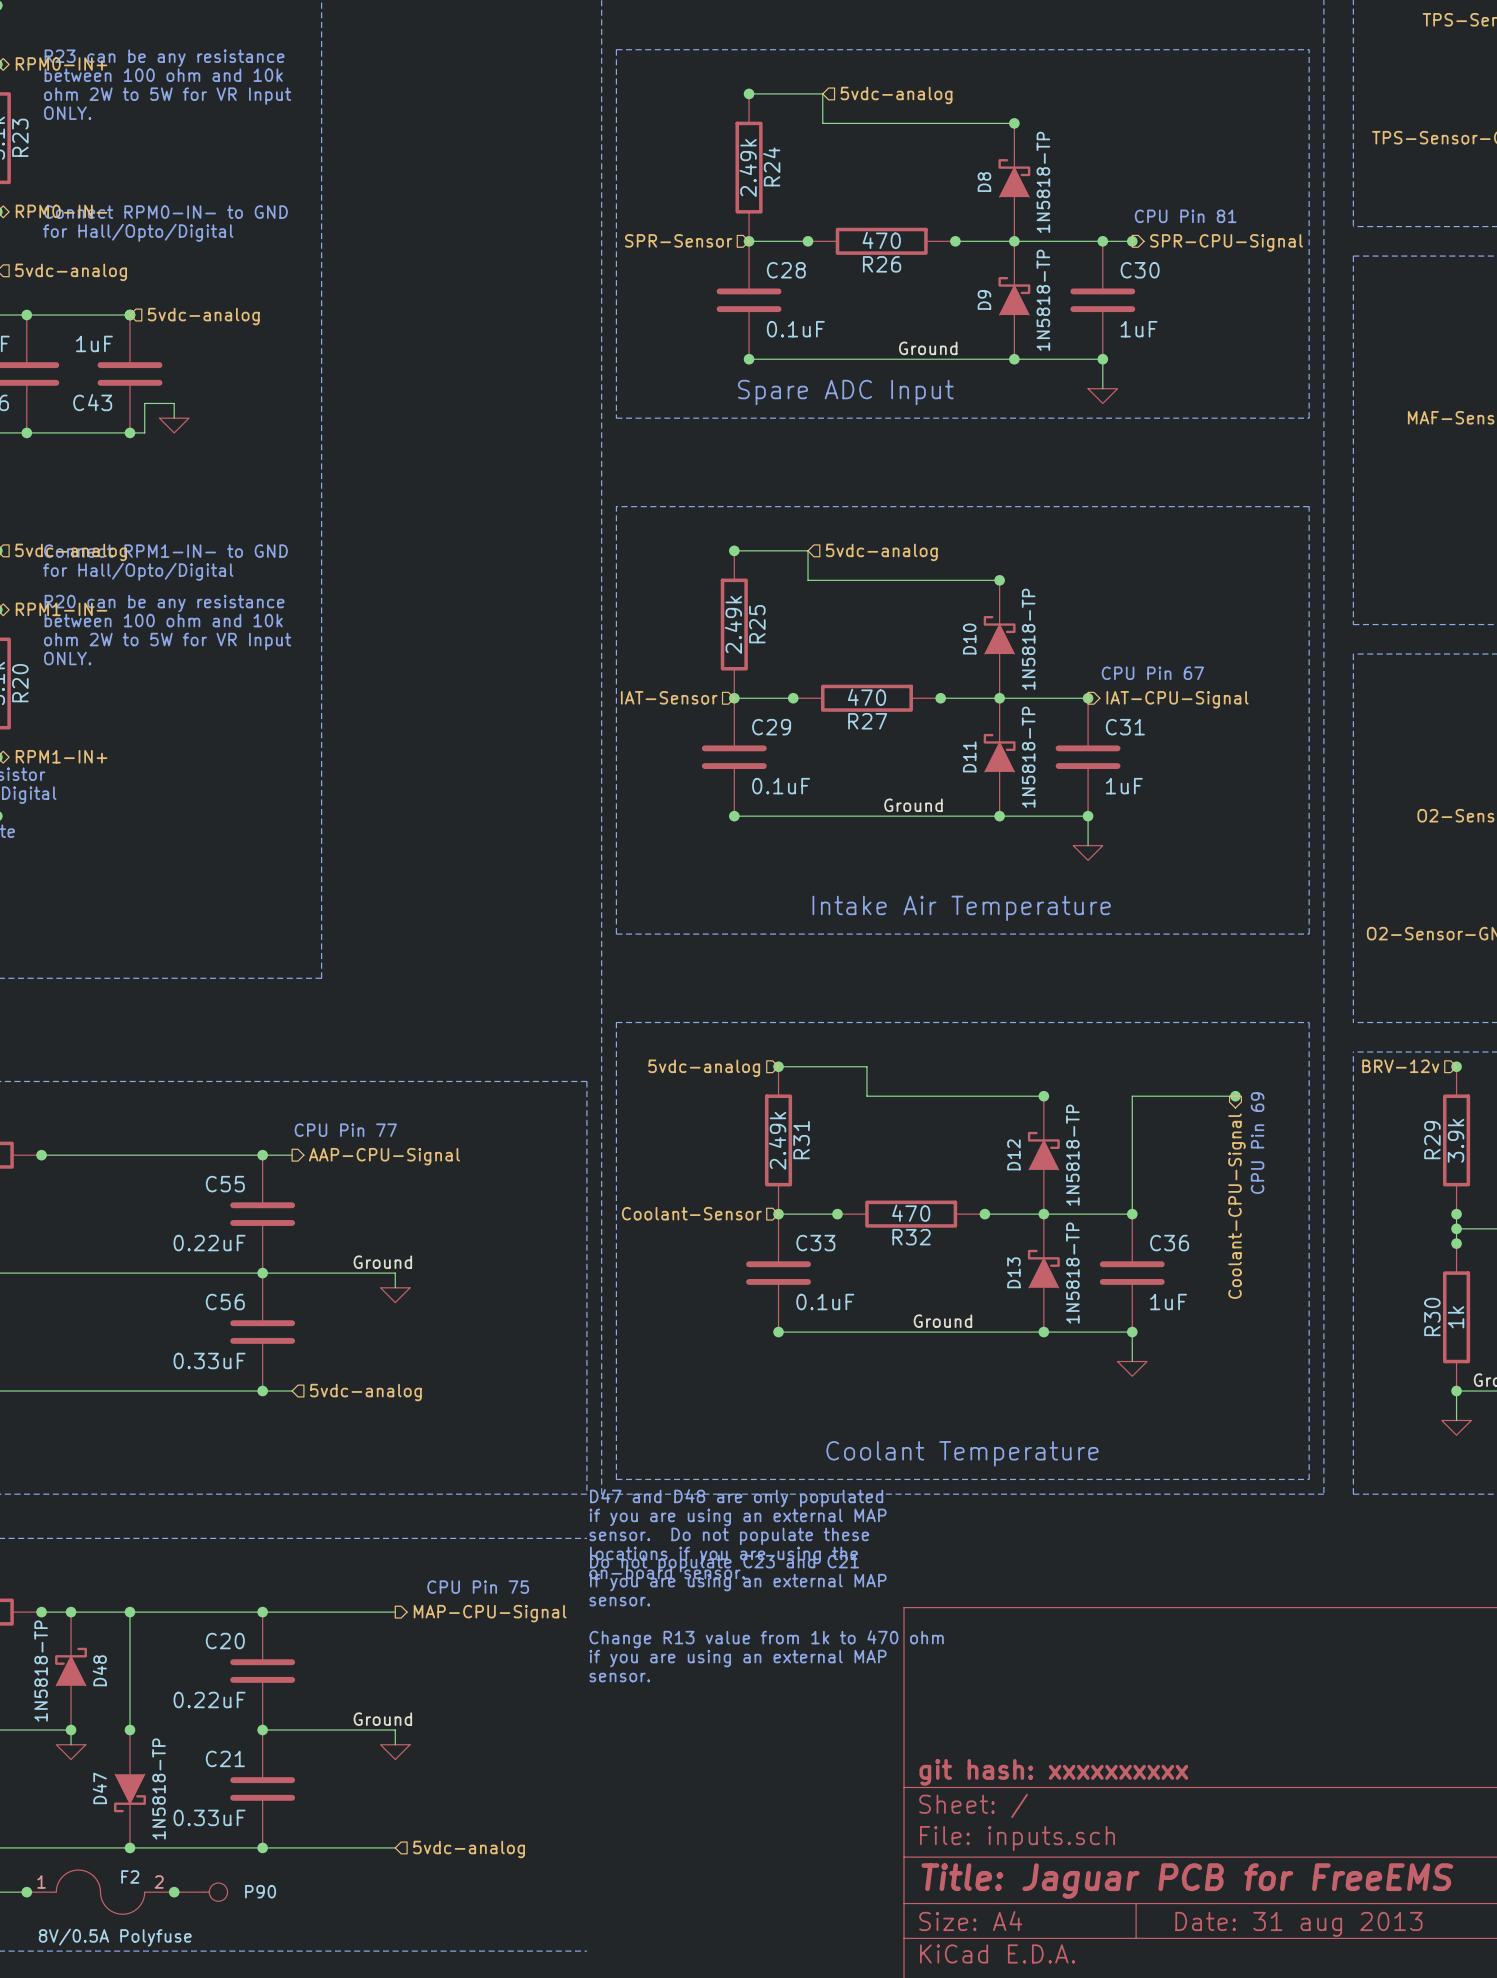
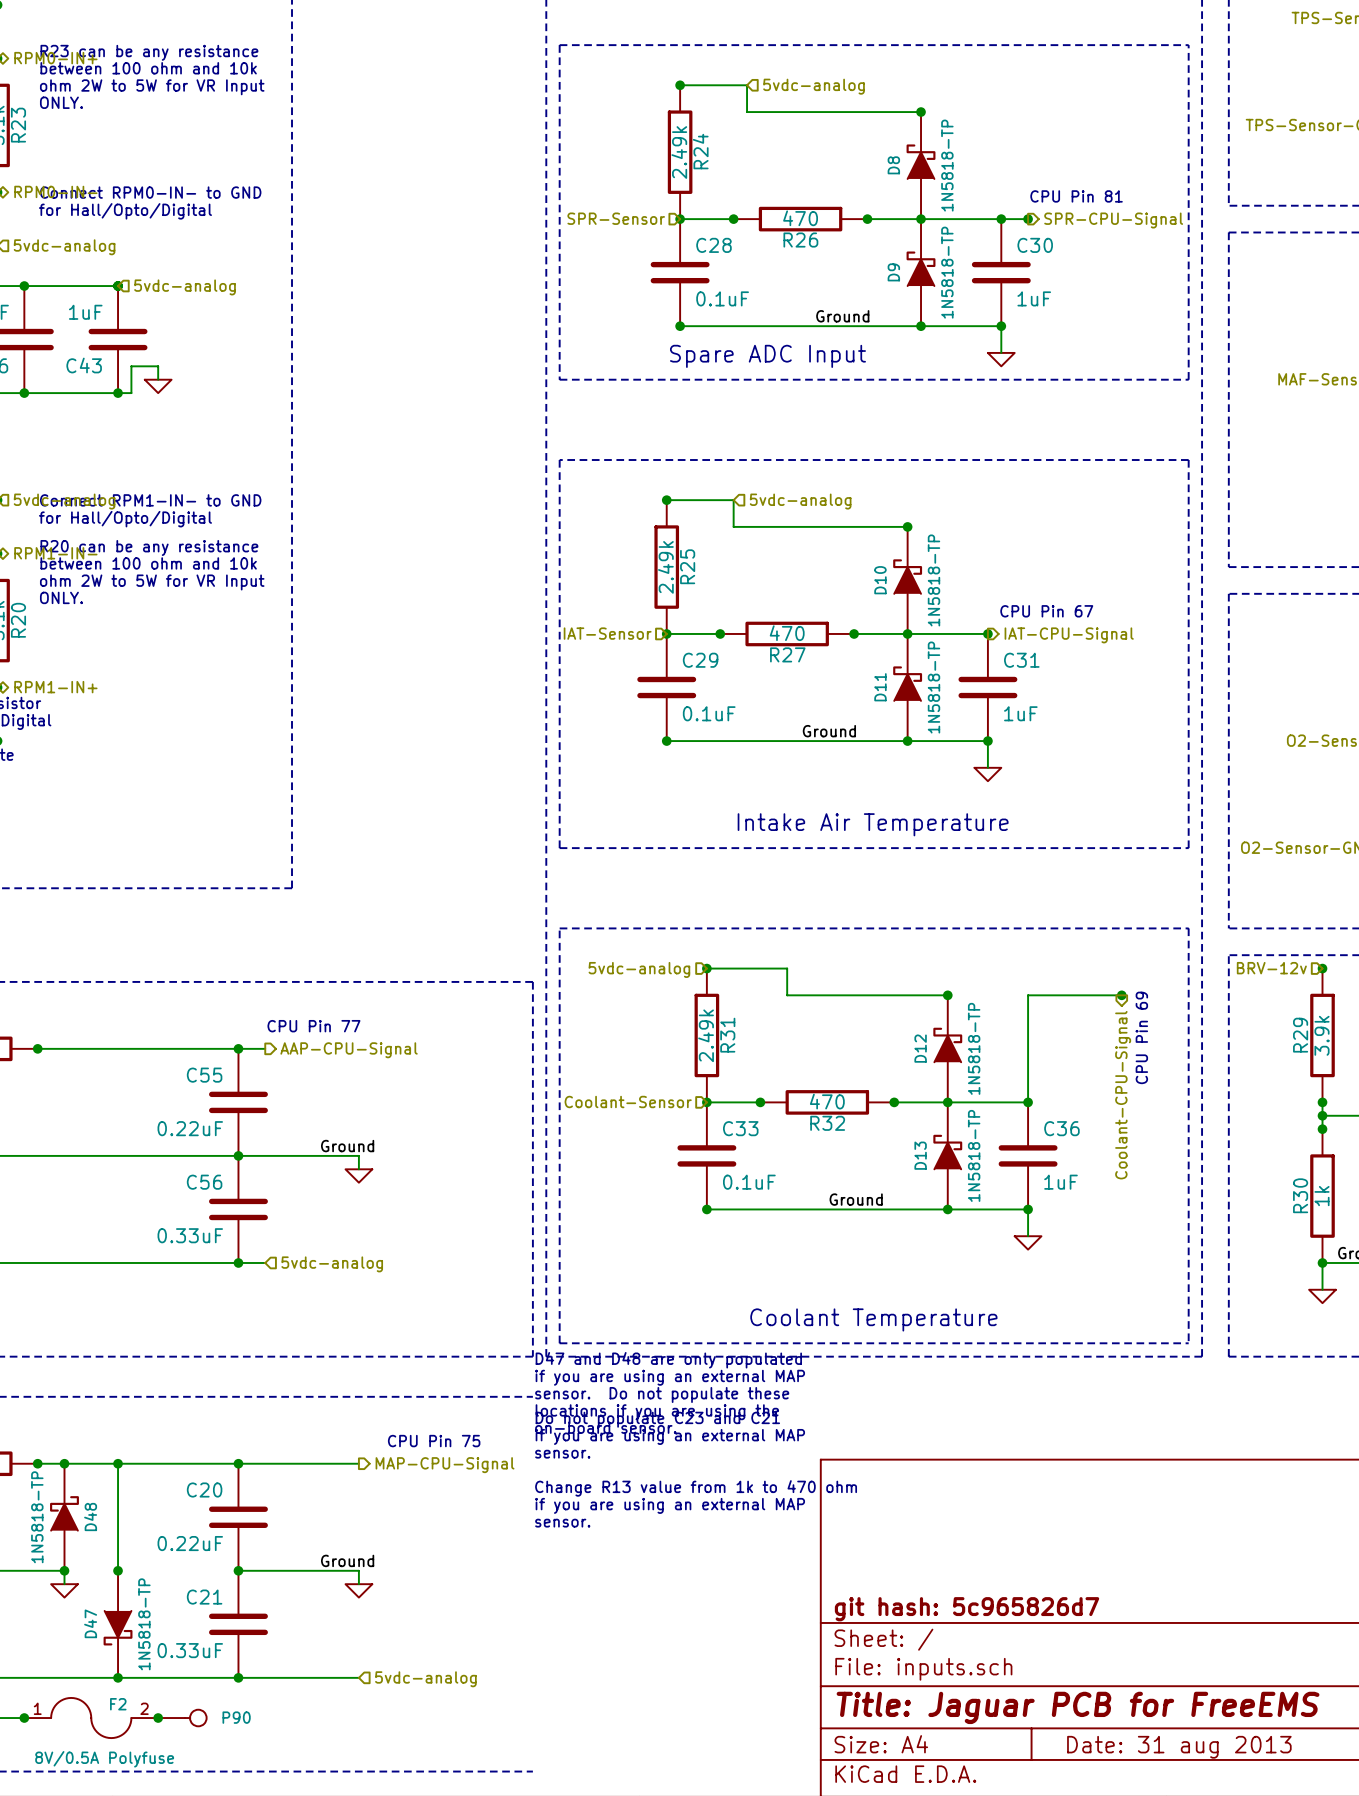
title block: git hash: xxxxxxxxxx (1053, 1772) -> git hash: 5c965826d7 (967, 1609)

